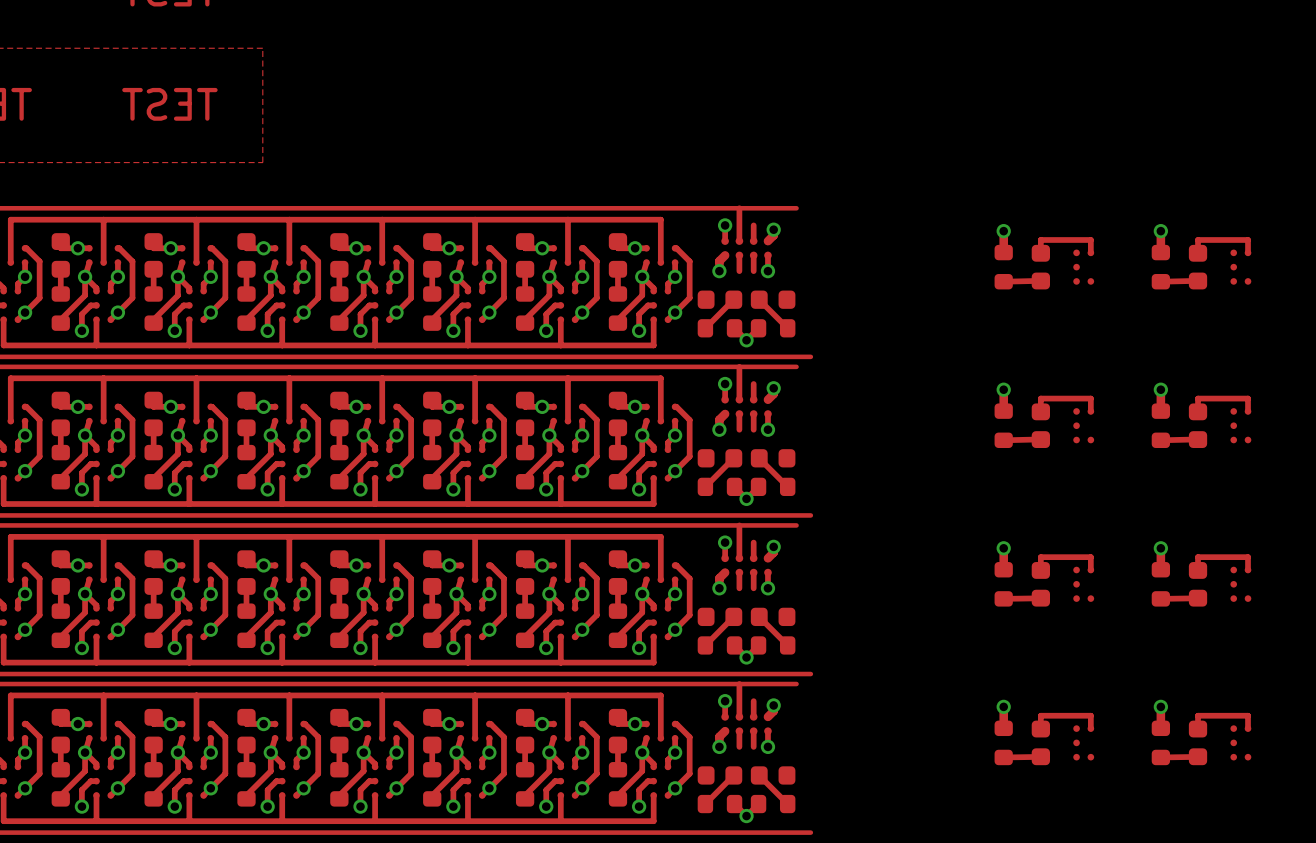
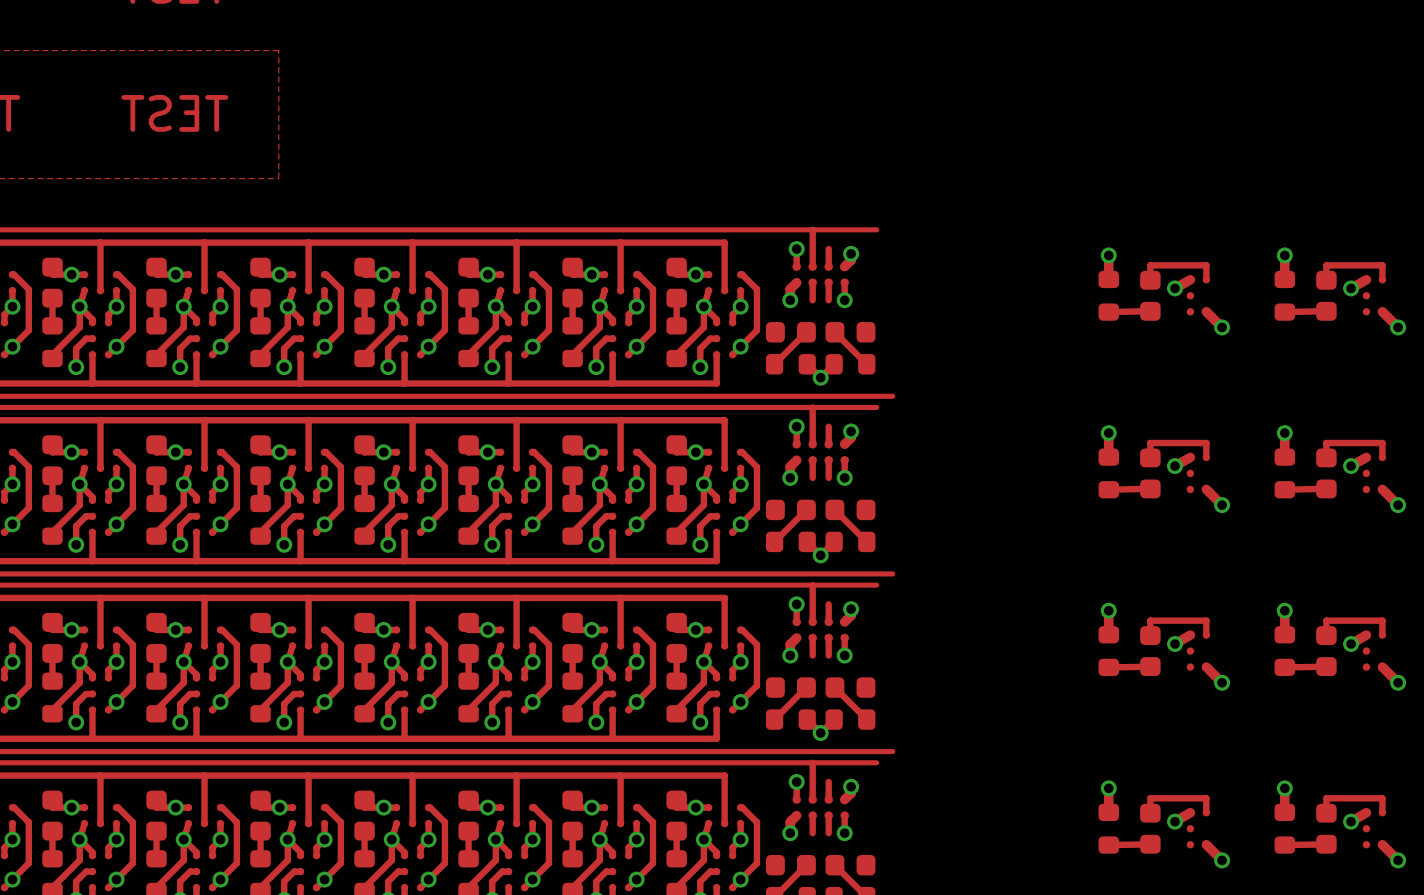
top track: none -> (1190, 279) (1175, 288)
top track: none -> (1366, 279) (1351, 288)
via: none -> (1175, 288)
via: none -> (1351, 288)
top track: none -> (1206, 311) (1222, 327)
top track: none -> (1382, 311) (1398, 327)
via: none -> (1222, 327)
via: none -> (1398, 327)
top track: none -> (1190, 457) (1175, 466)
top track: none -> (1366, 457) (1351, 466)
via: none -> (1175, 466)
via: none -> (1351, 466)
top track: none -> (1206, 489) (1222, 505)
top track: none -> (1382, 489) (1398, 505)
via: none -> (1222, 505)
via: none -> (1398, 505)
top track: none -> (1190, 635) (1175, 644)
top track: none -> (1366, 635) (1351, 644)
via: none -> (1175, 644)
via: none -> (1351, 644)
top track: none -> (1206, 667) (1222, 682)
top track: none -> (1382, 667) (1398, 682)
via: none -> (1222, 682)
via: none -> (1398, 682)
top track: none -> (1190, 812) (1175, 821)
top track: none -> (1366, 812) (1351, 821)
via: none -> (1175, 821)
via: none -> (1351, 821)
top track: none -> (1206, 844) (1222, 860)
top track: none -> (1382, 844) (1398, 860)
via: none -> (1222, 860)
via: none -> (1398, 860)

